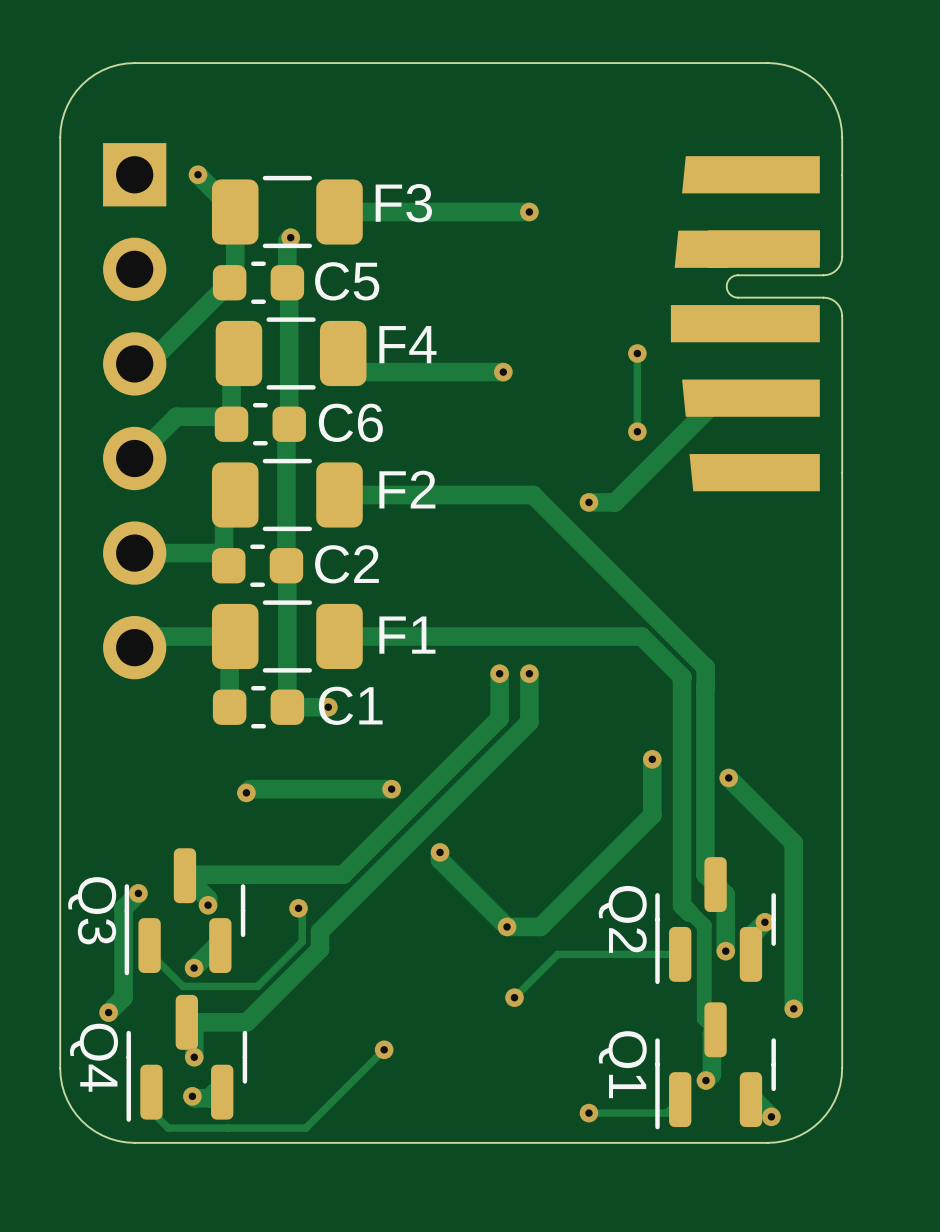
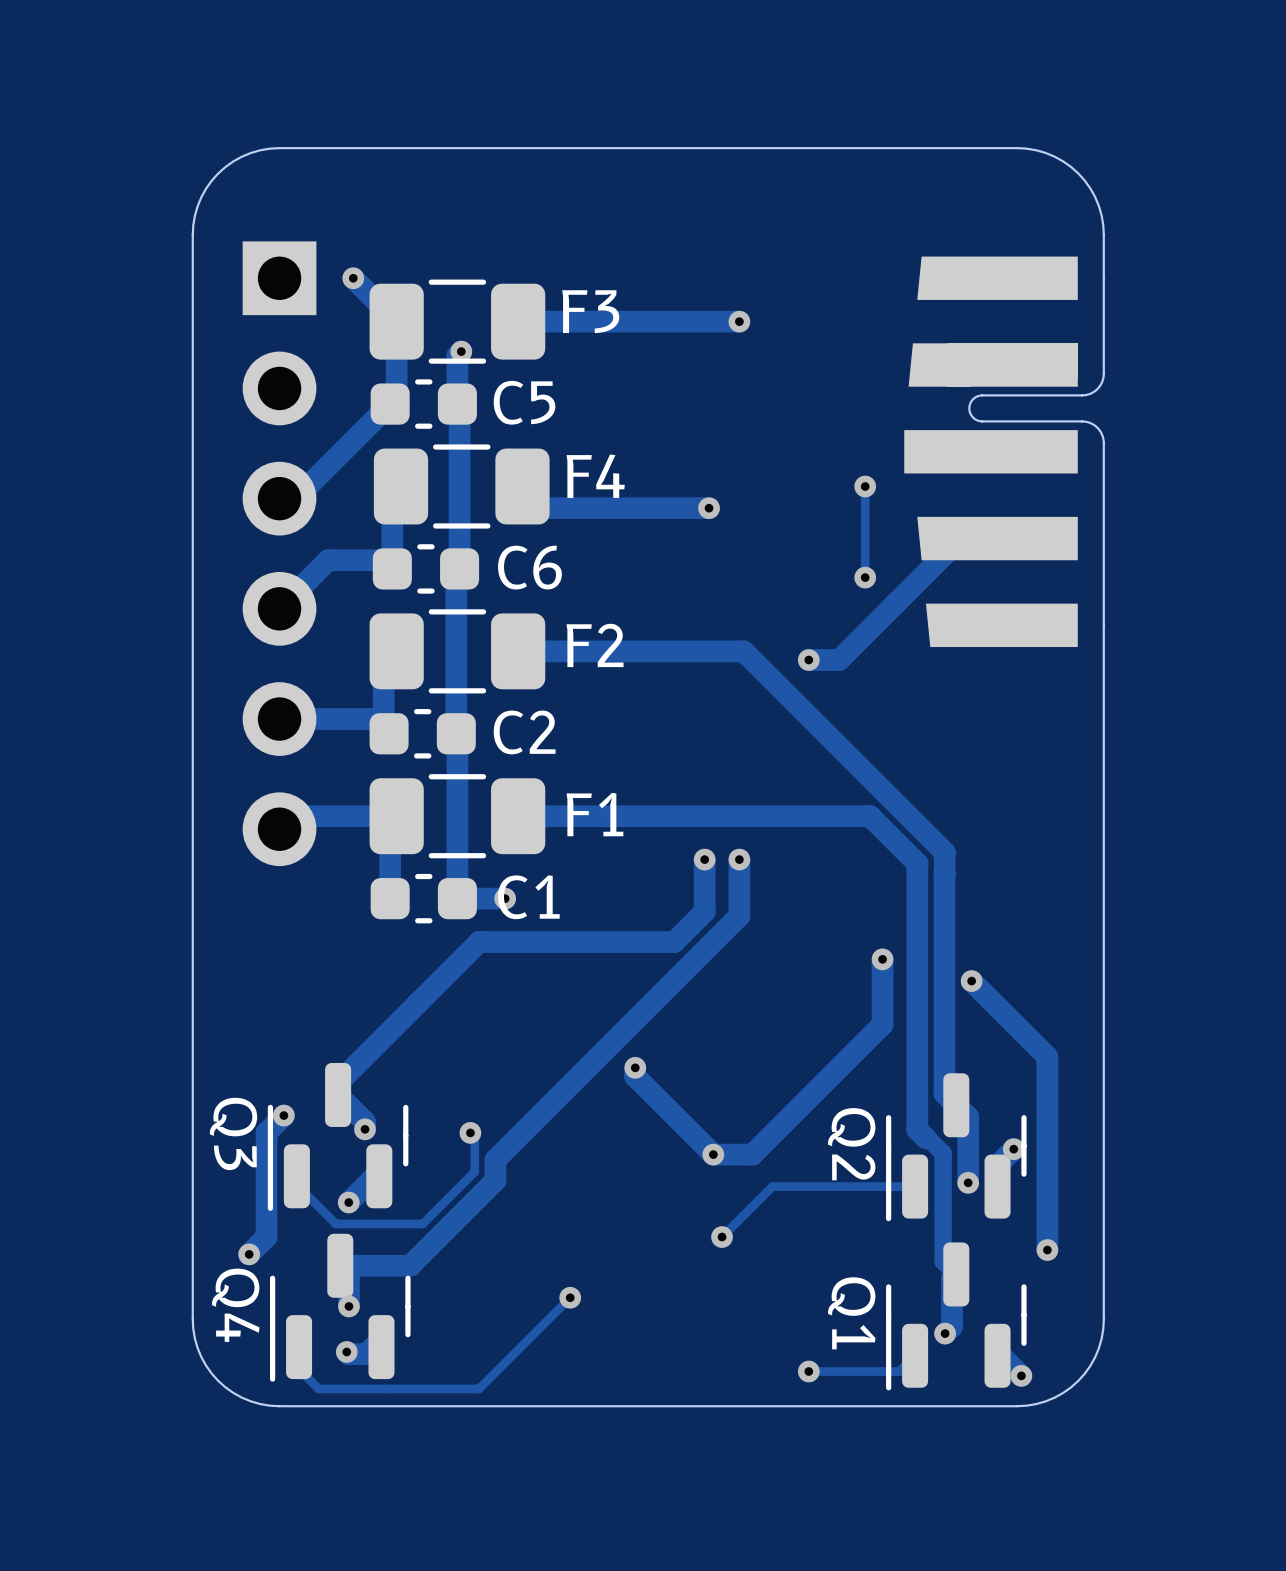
track: (473, 744) (343, 874) (184, 875) -> (674, 942) (479, 942) (338, 1083) (338, 1094)
track: (391, 789) (250, 789) (246, 792) -> none
via: (391, 789) -> none
via: (246, 792) -> none

